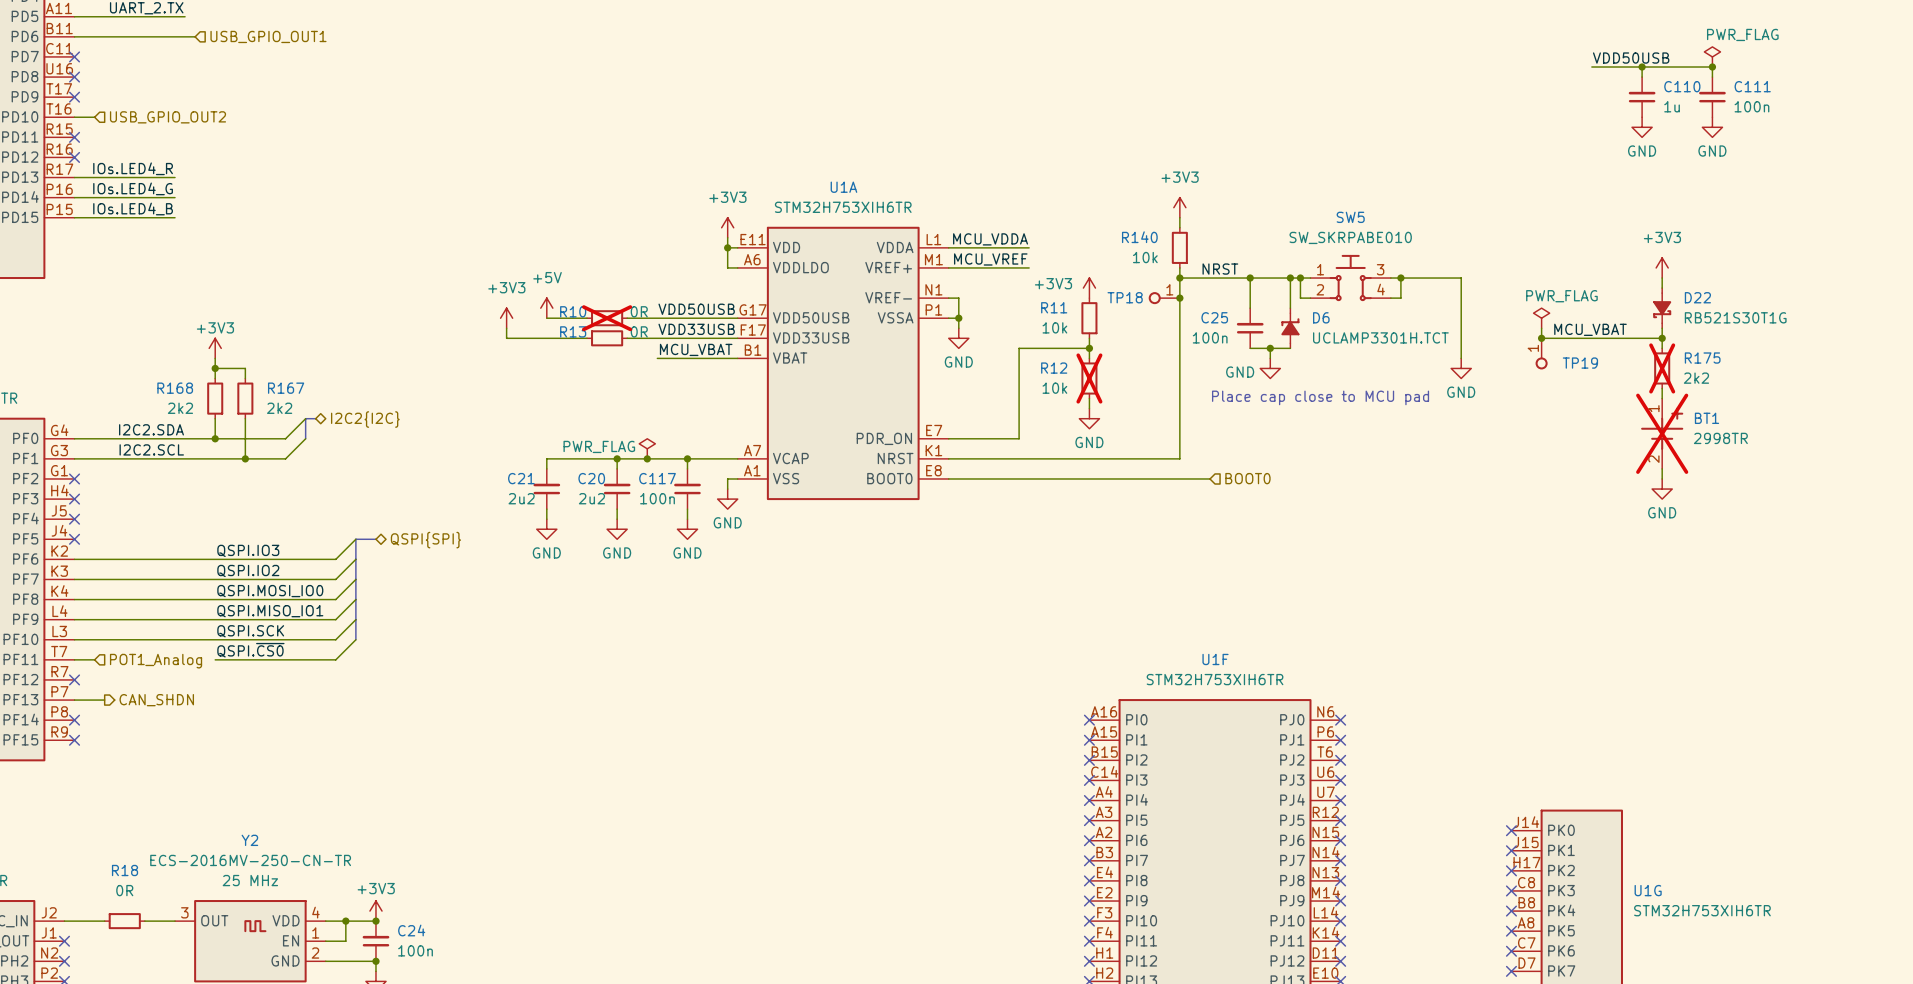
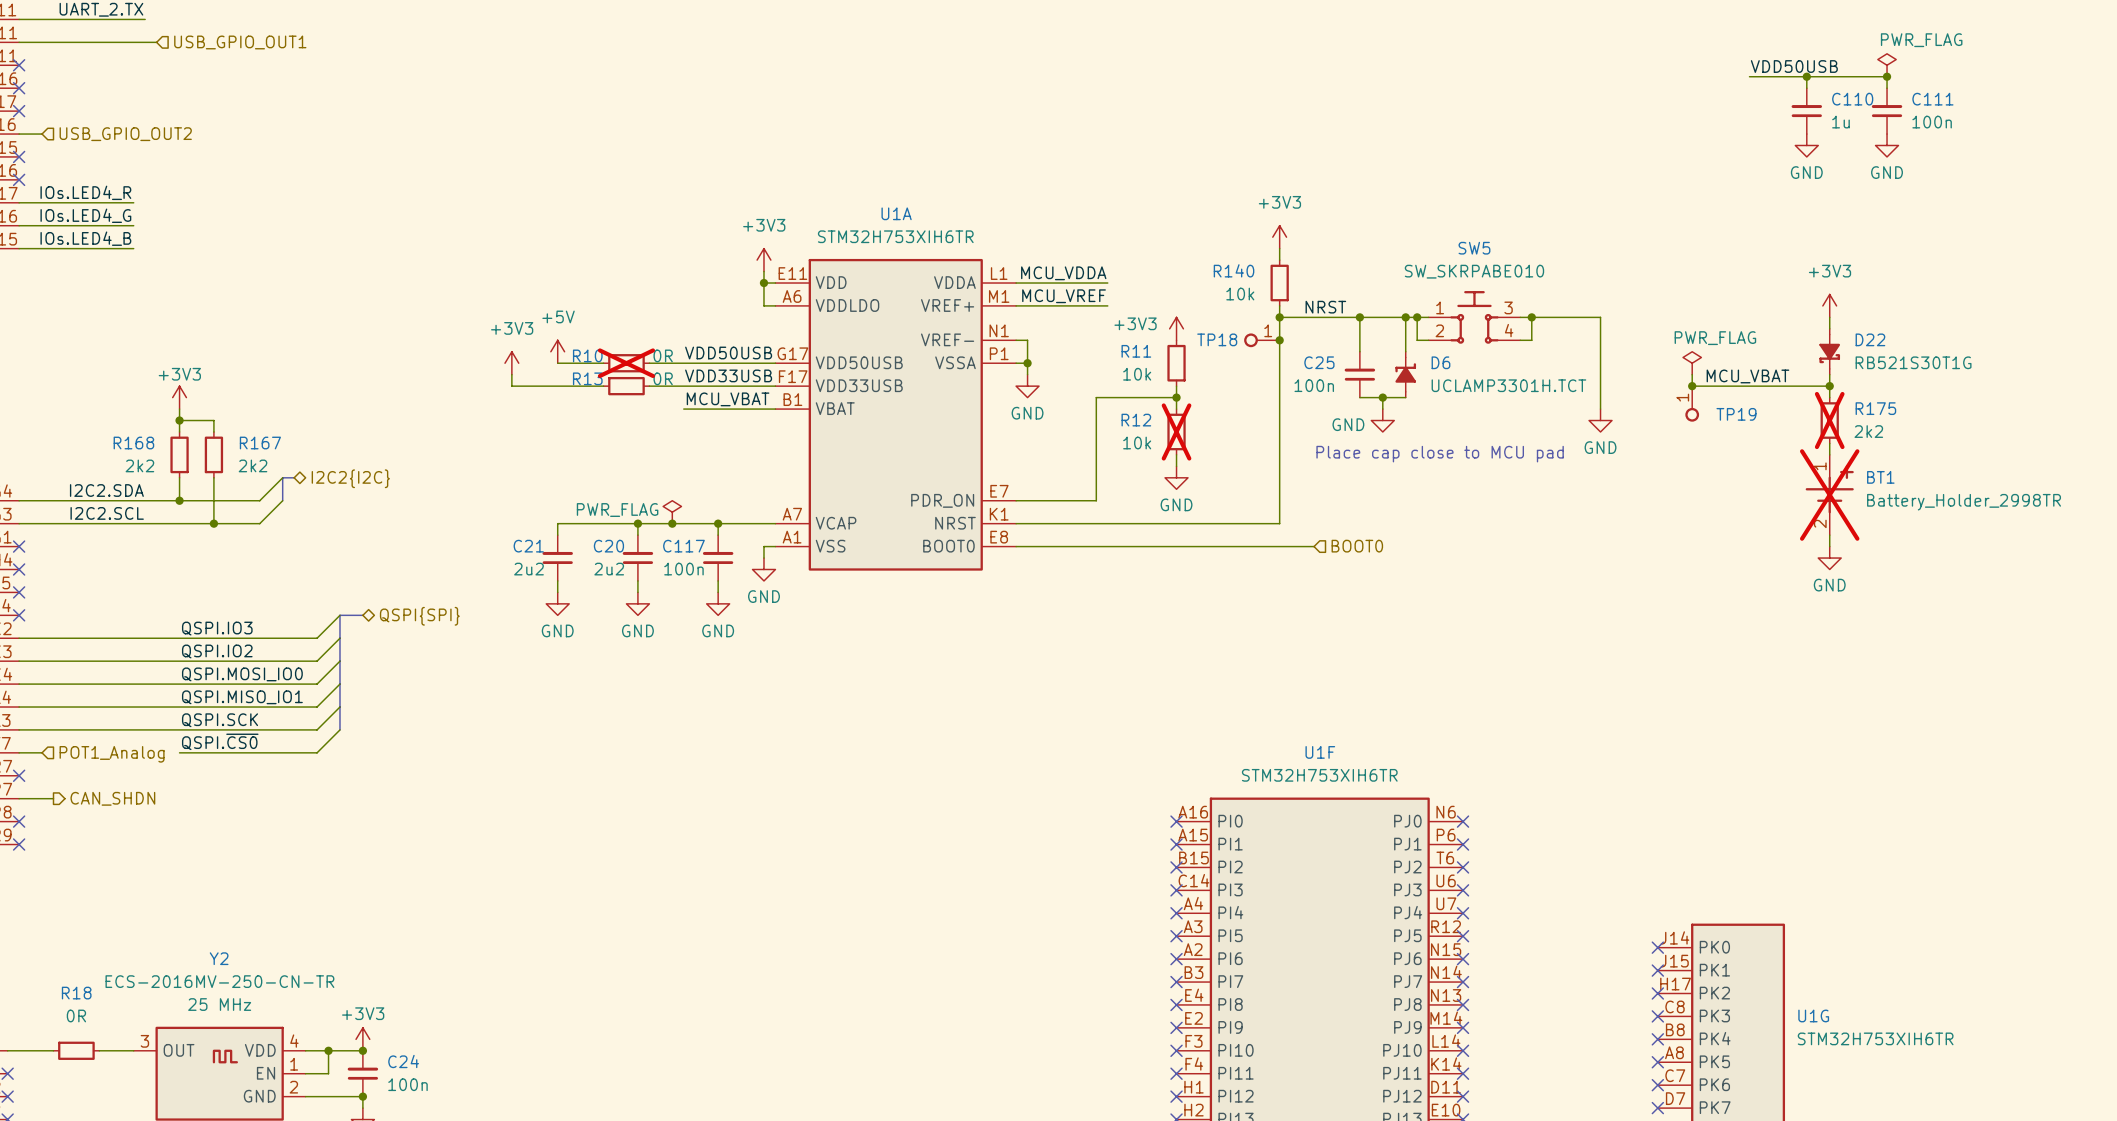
BT1 text: 2998TR (1720, 438) -> none
BT1 value: none -> Battery_Holder_2998TR (1964, 502)

